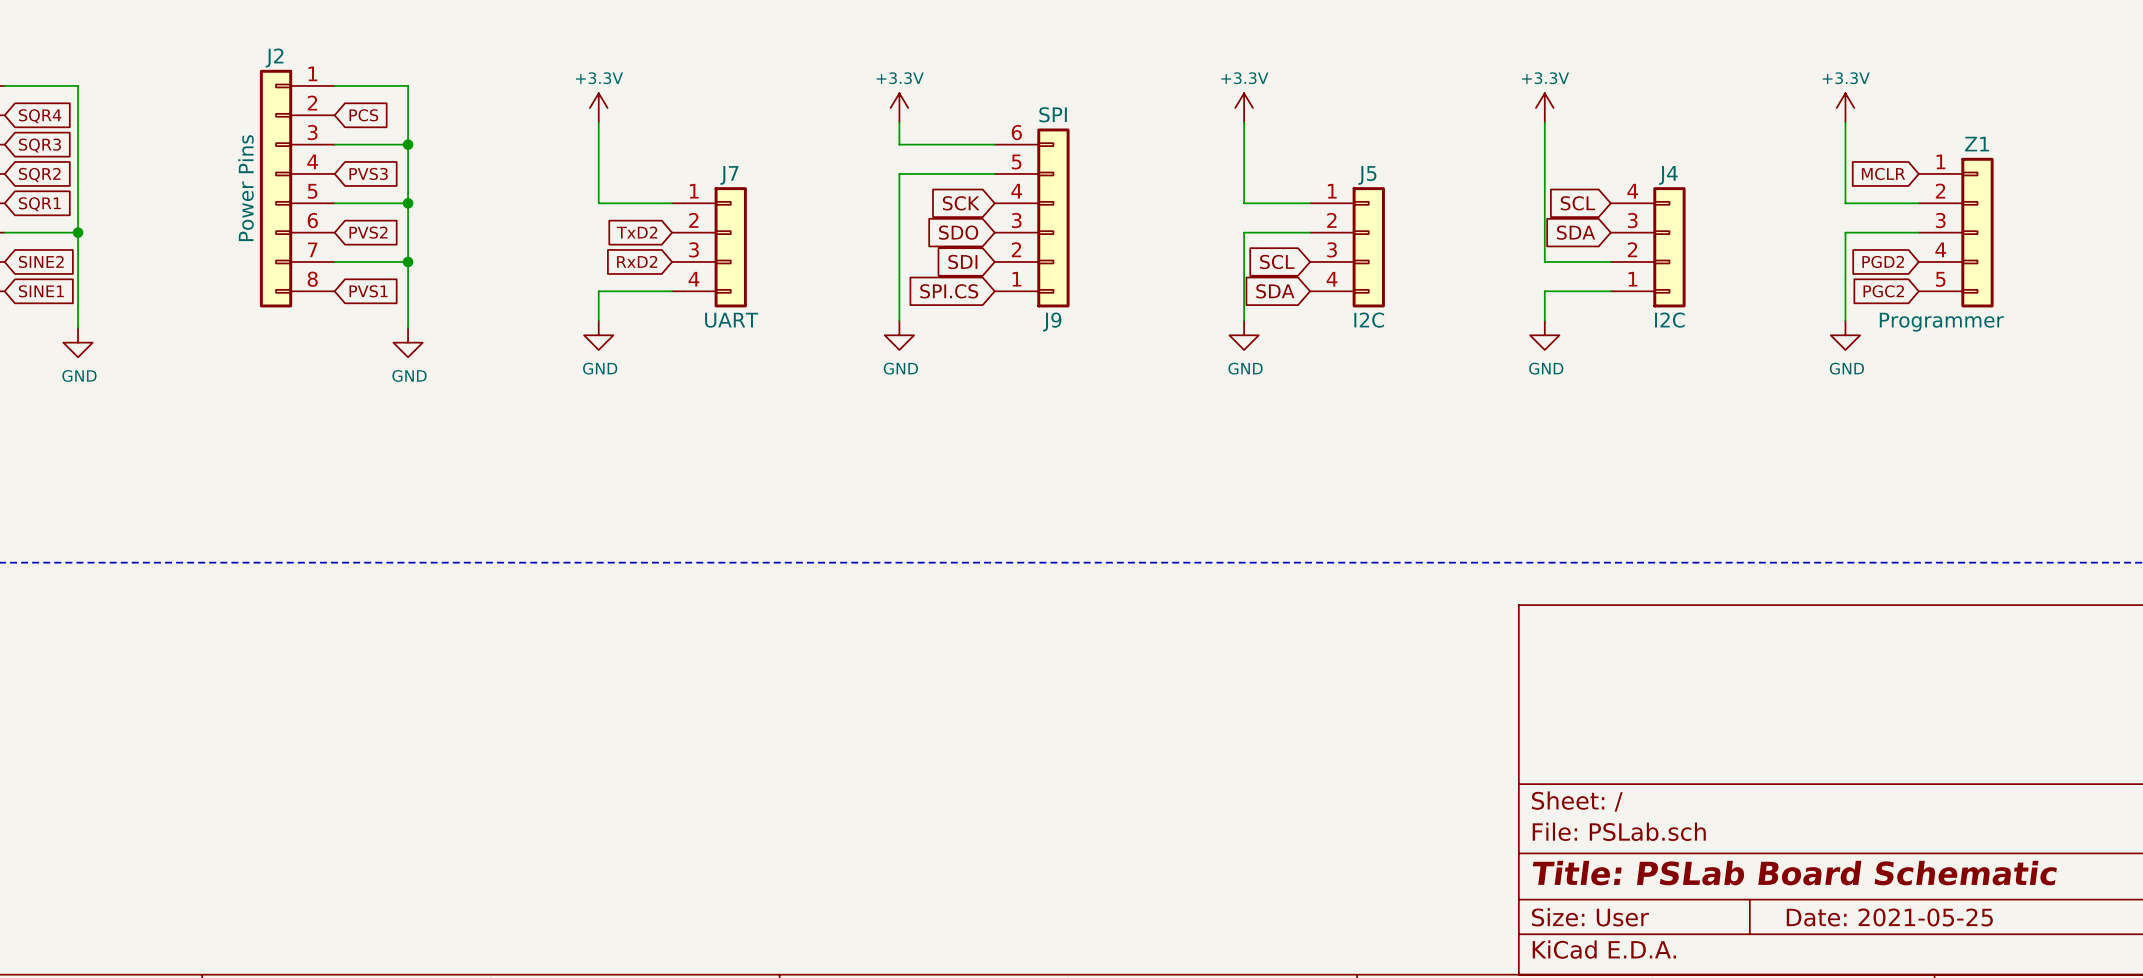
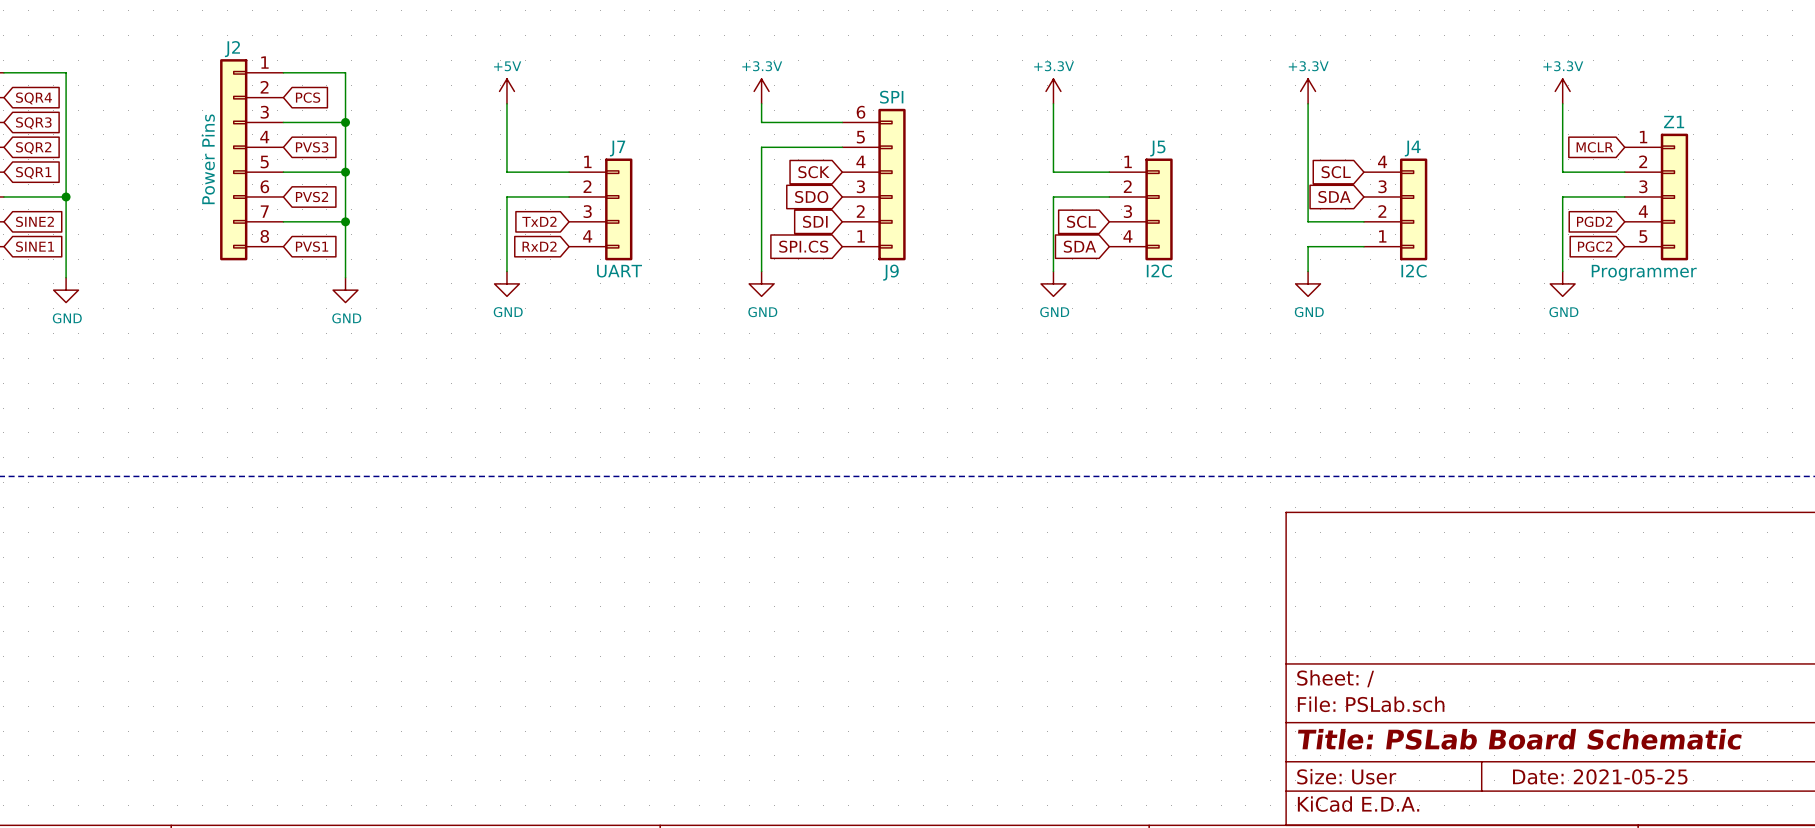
power symbol: +3.3V (598, 107) -> +5V (506, 91)
global label: TxD2 (637, 232) -> none
global label: RxD2 (637, 261) -> TxD2 (539, 221)
wire: (598, 291) (672, 291) -> (506, 246) (506, 196) (569, 196)
global label: none -> RxD2 (539, 246)

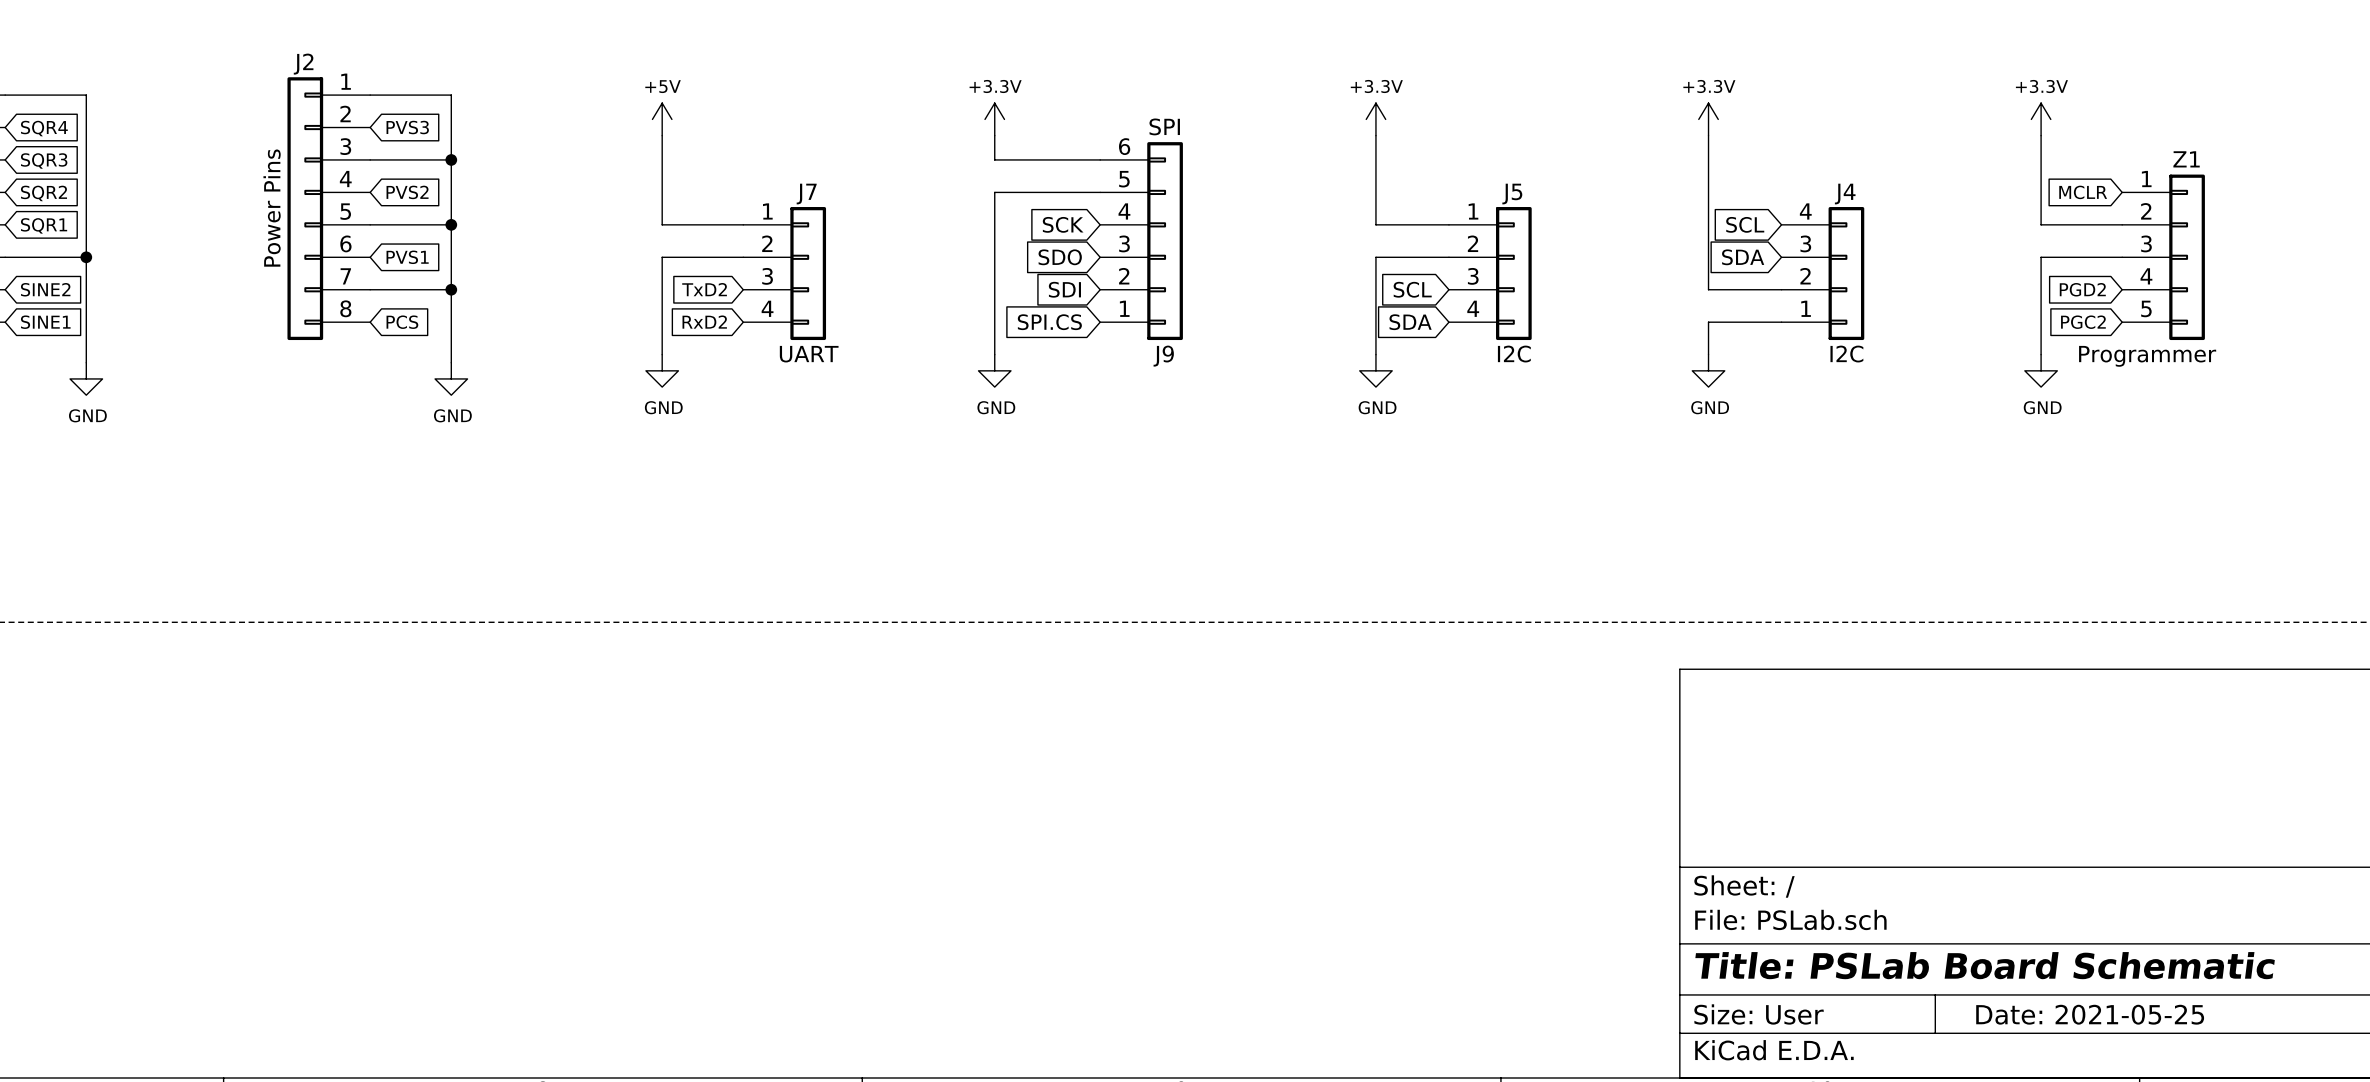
global label: PCS (308, 97) -> PVS3 (407, 127)
global label: PVS3 (312, 147) -> PVS2 (407, 192)
global label: PVS2 (312, 197) -> PVS1 (407, 257)
global label: PVS1 (312, 246) -> PCS (402, 322)

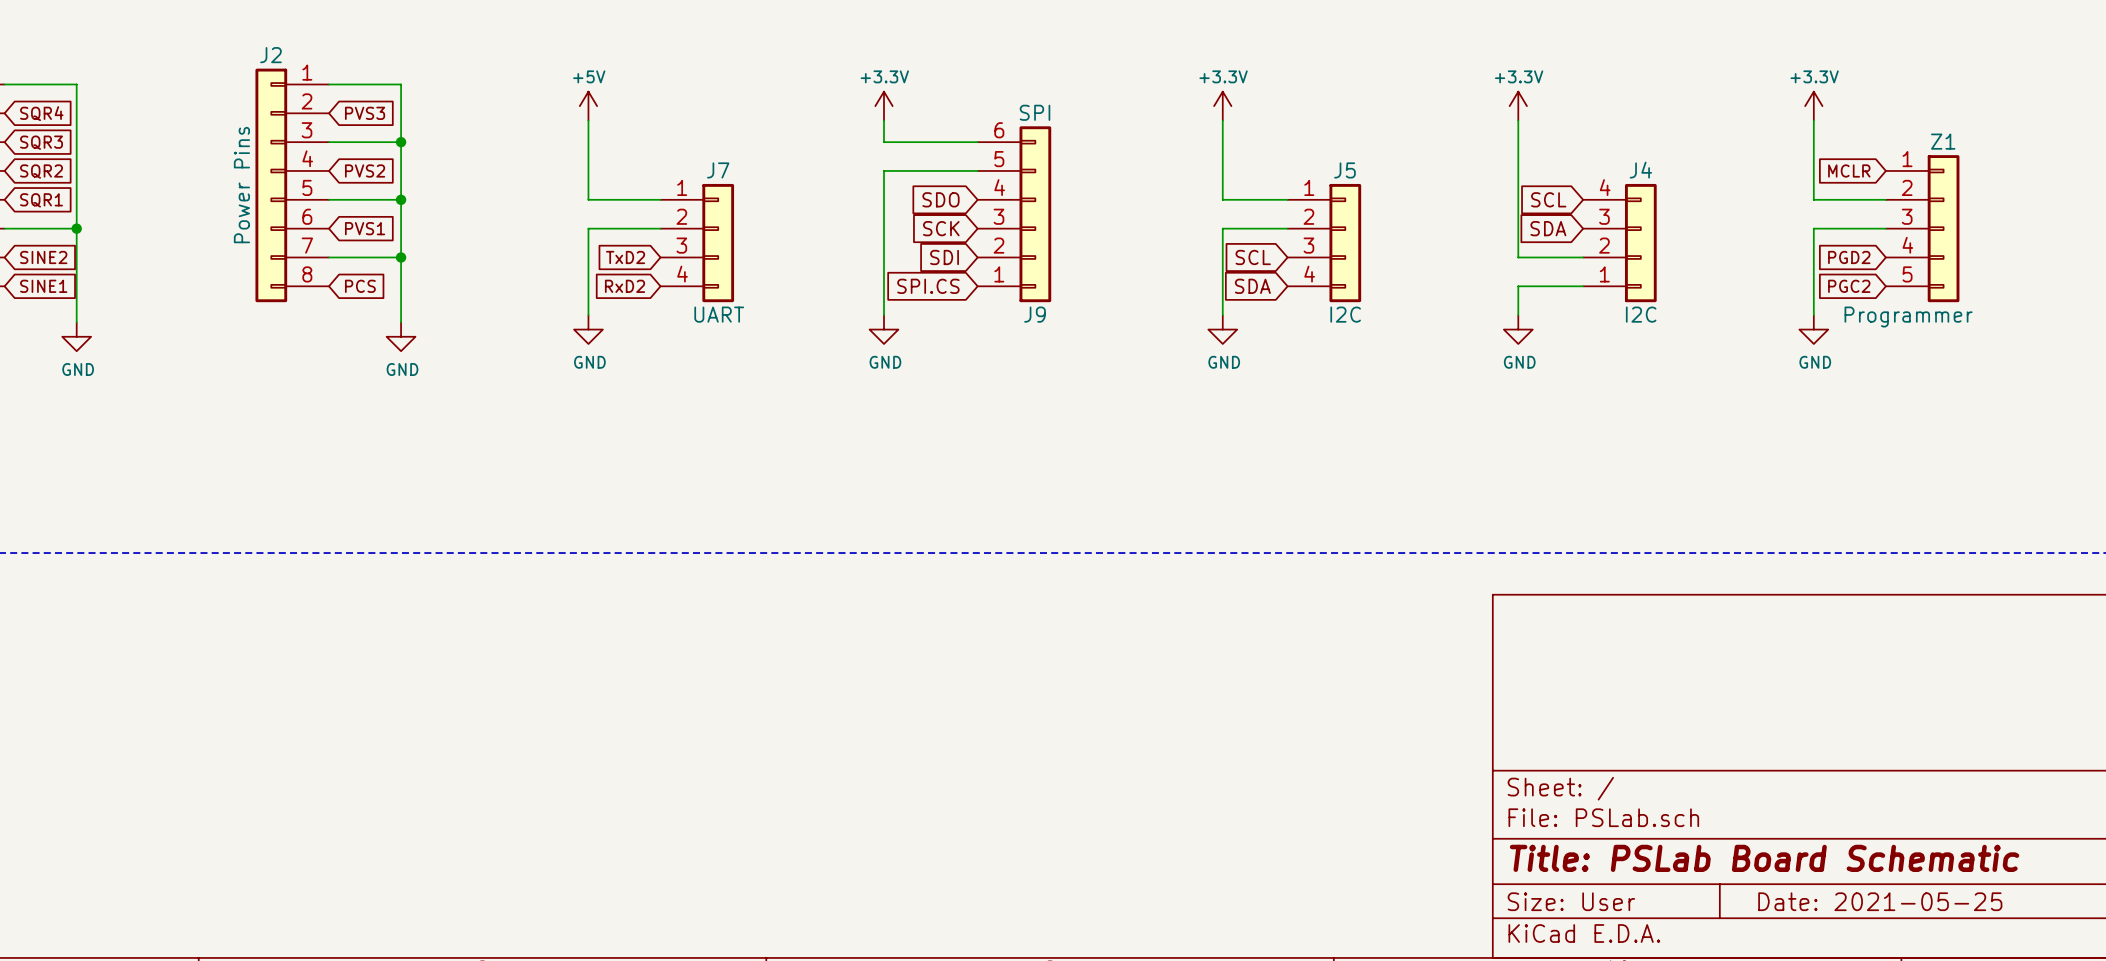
global label: SCK (1063, 224) -> SDO (940, 199)
global label: SDO (1060, 257) -> SCK (941, 228)

